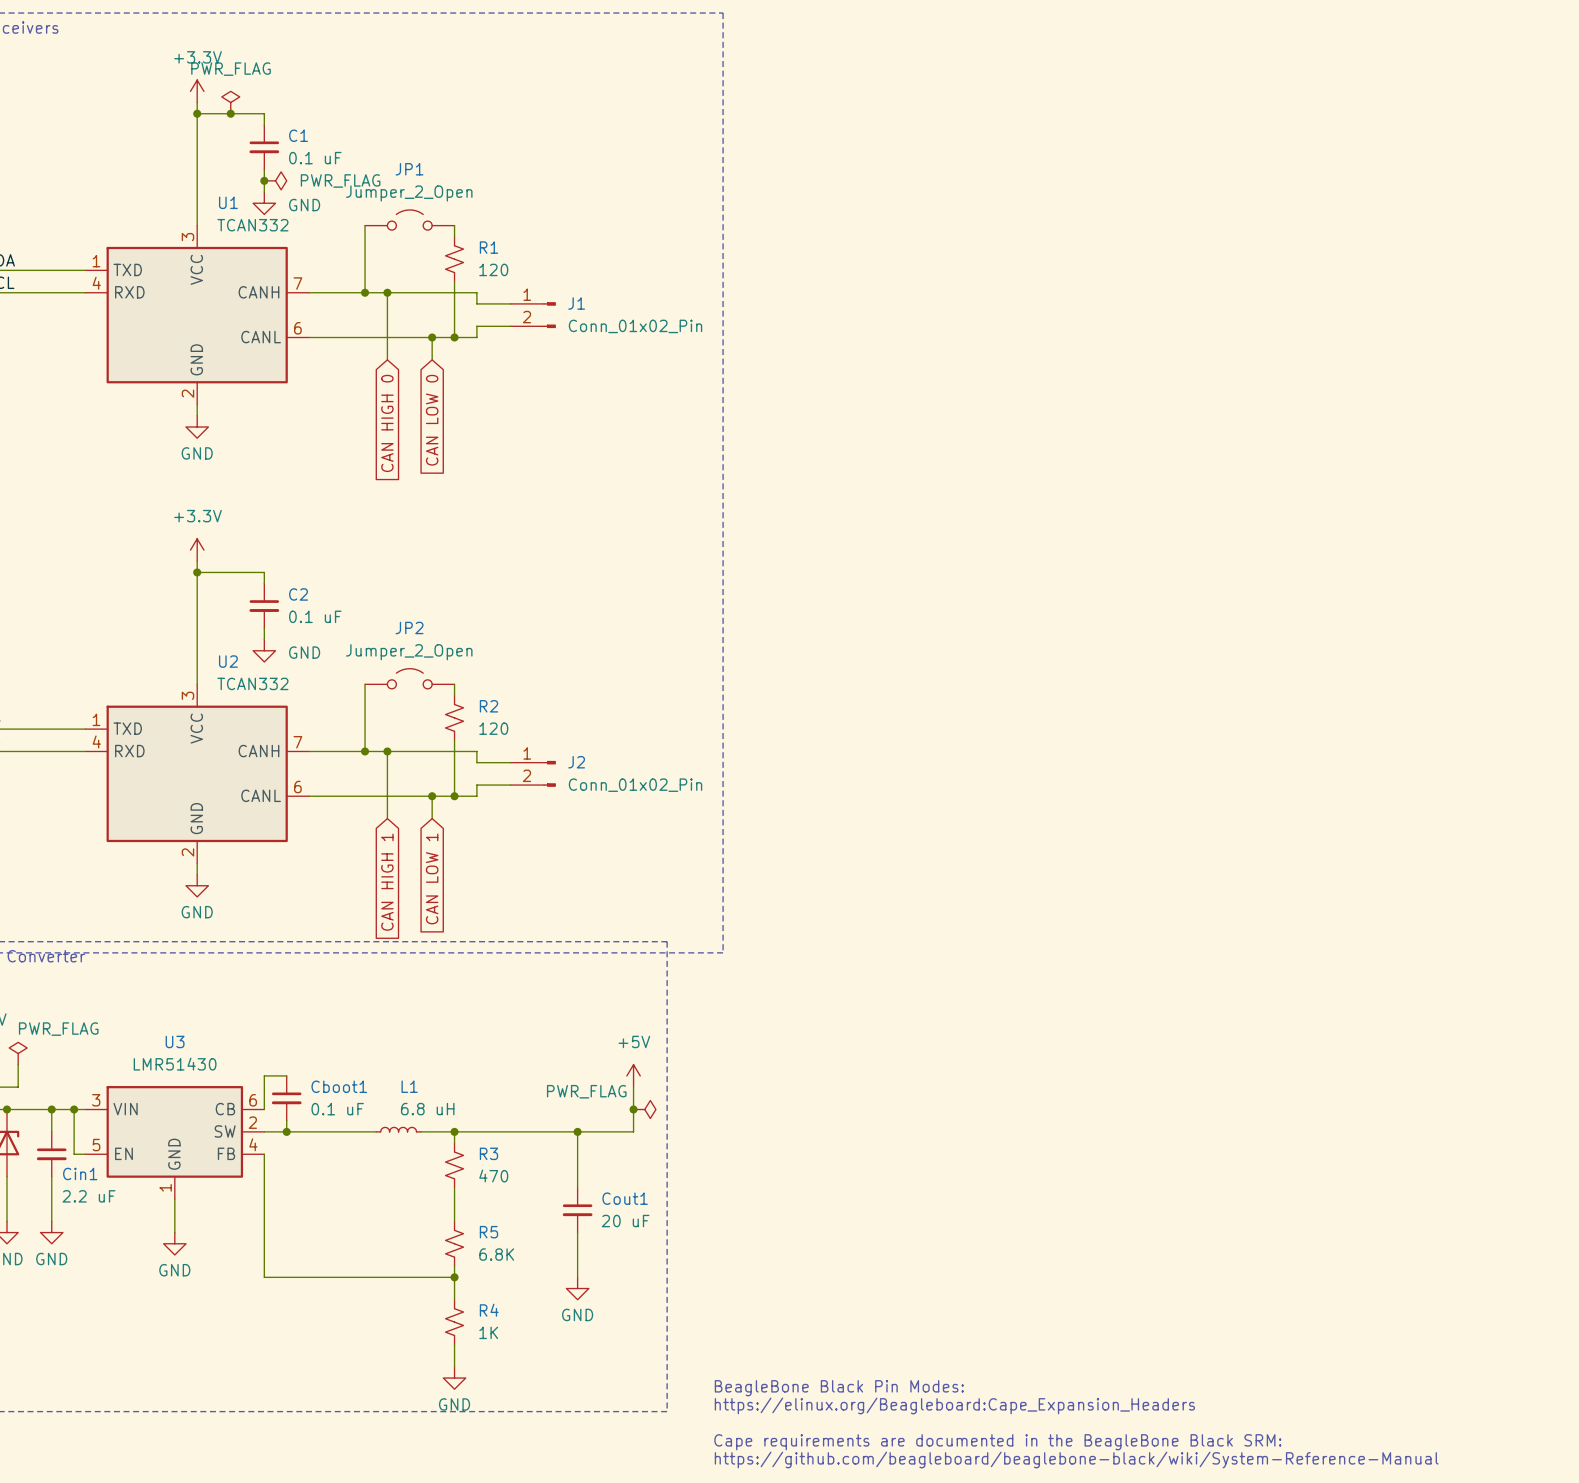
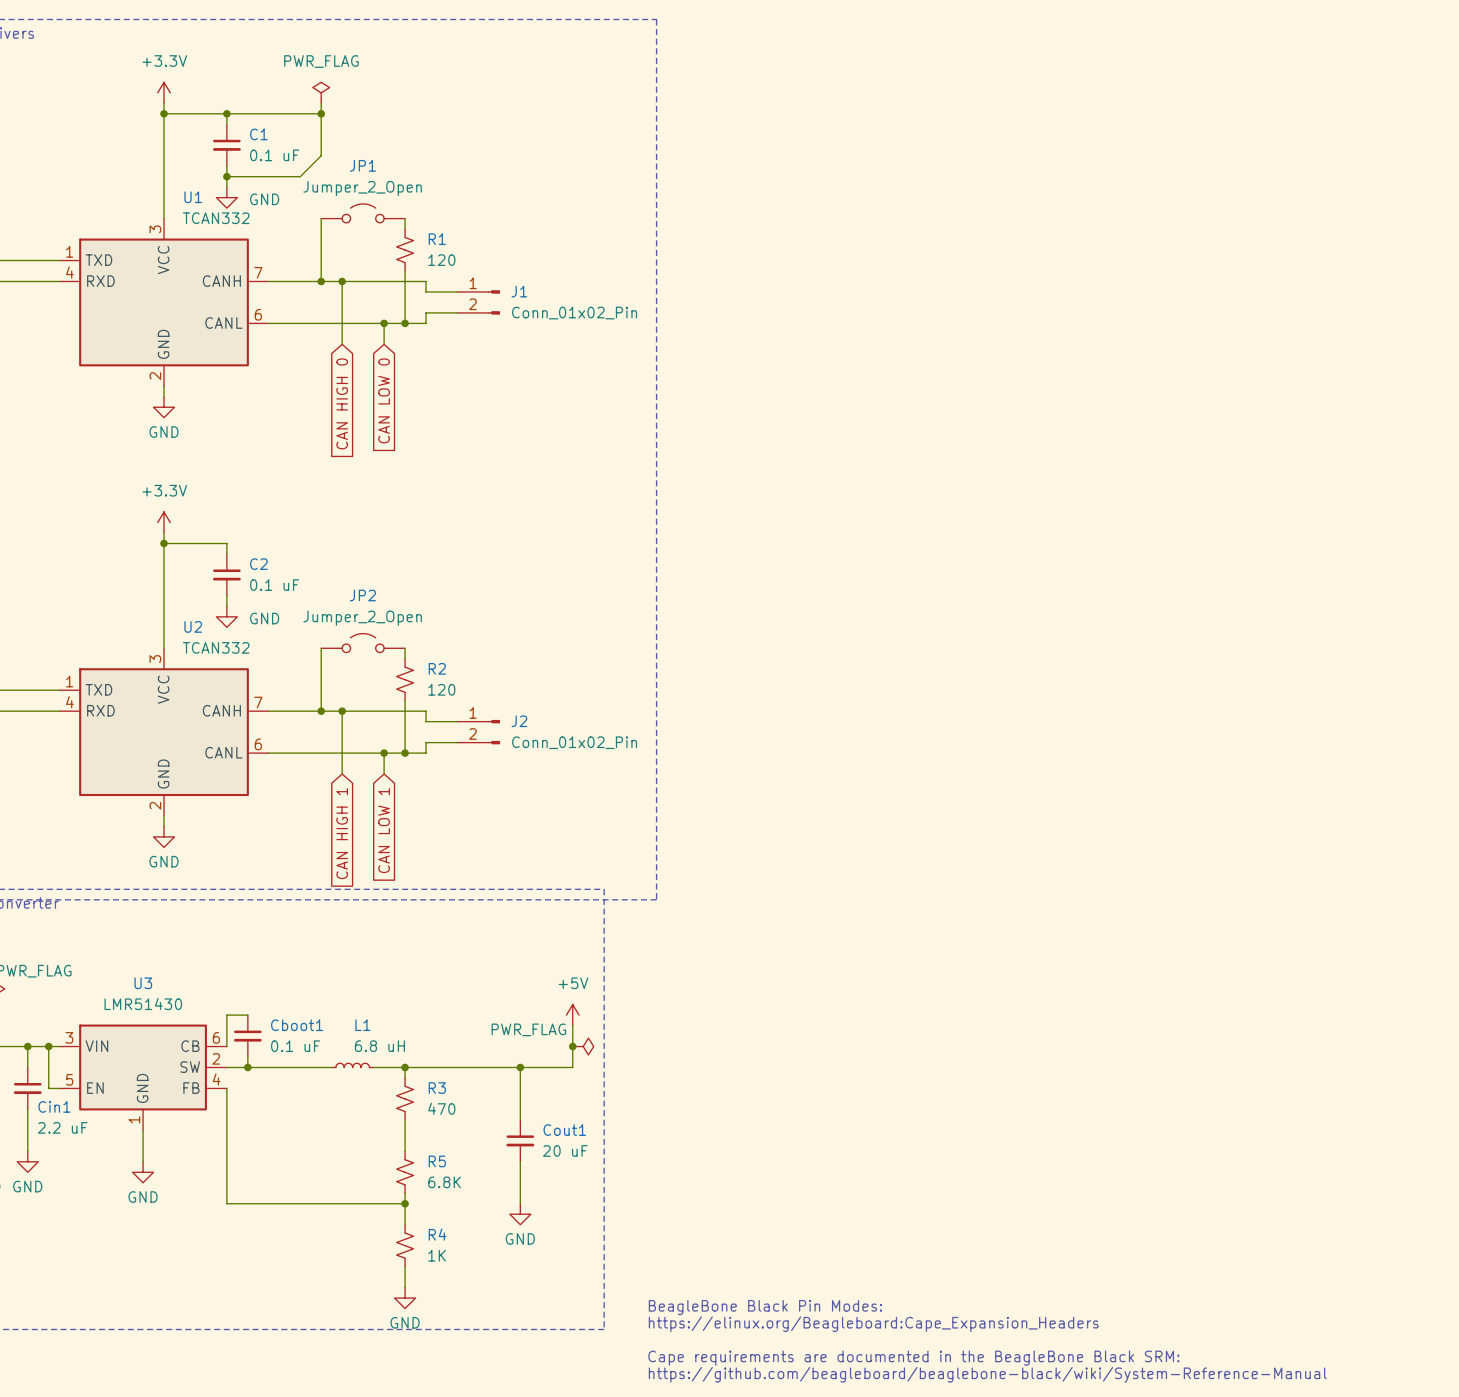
power symbol: none -> PWR_FLAG (321, 92)
power symbol: PWR_FLAG (230, 102) -> none
wire: none -> (321, 103) (321, 155) (300, 176) (226, 176)
junction position: (230, 113) -> (226, 113)
wire: none -> (226, 113) (321, 113)
junction: none -> (321, 113)
power symbol: PWR_FLAG (275, 180) -> none

